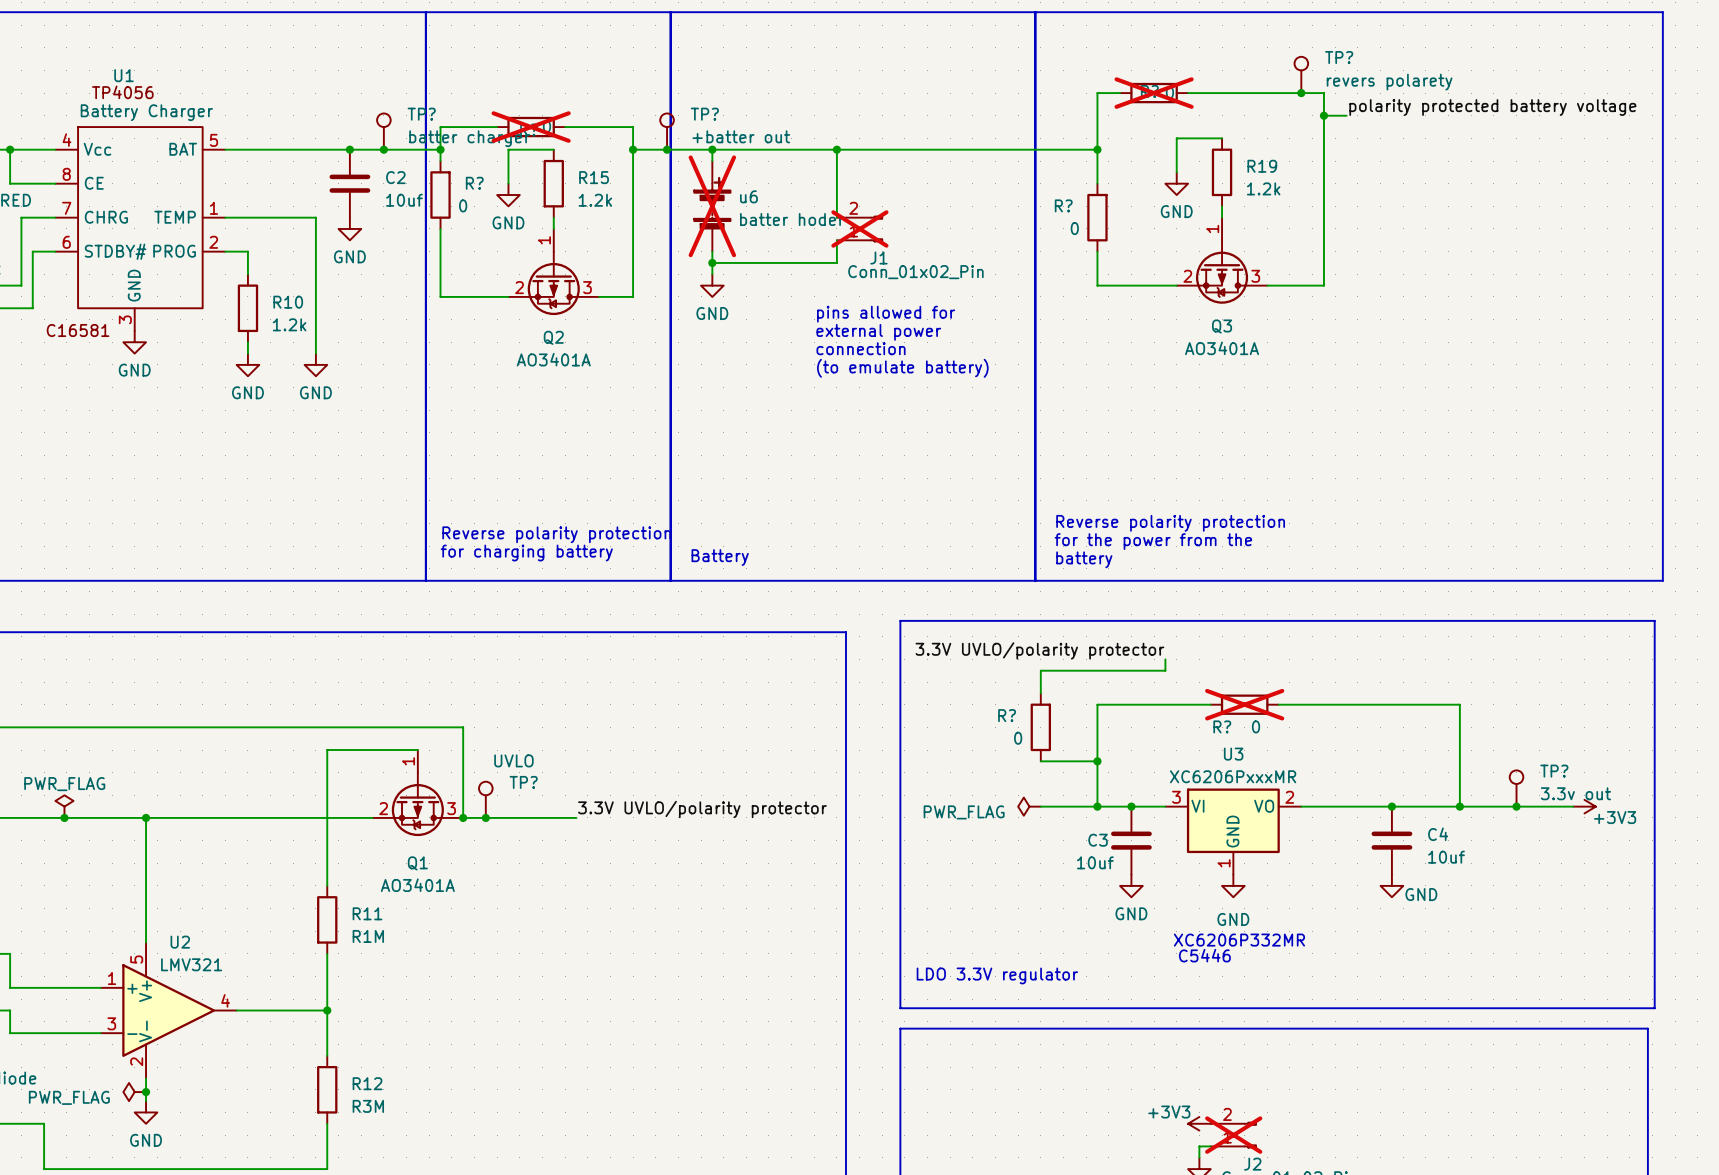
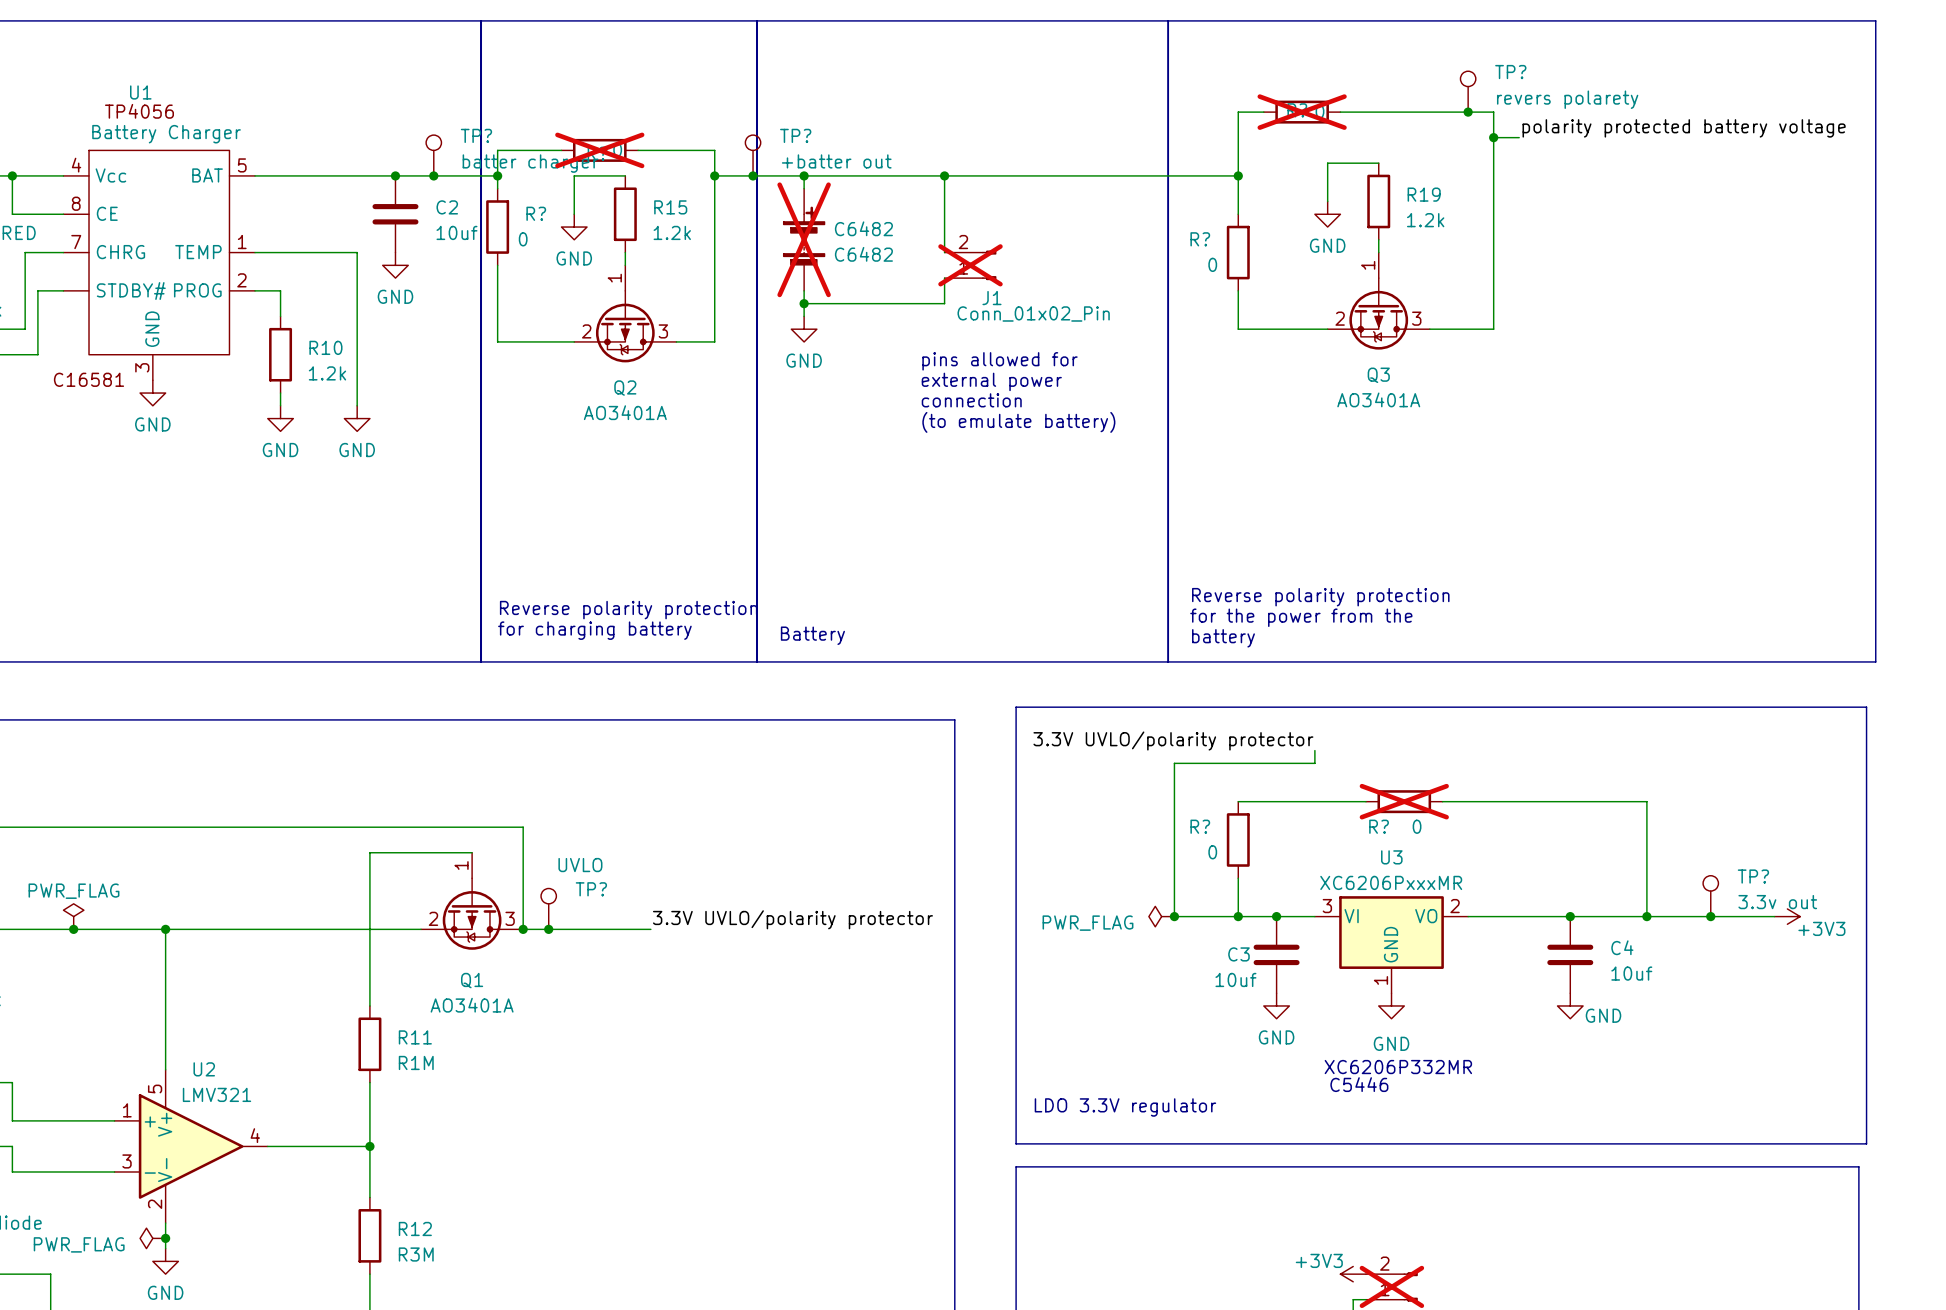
u6 name: u6 (748, 196) -> C6482 (863, 228)
u6 value: batter hoder (792, 219) -> C6482 (863, 254)
U1 pin number: 6 (66, 242) -> none
wire: none -> (1174, 788) (1174, 916)
wire: (1097, 704) (1097, 772) -> none
R? position: (1040, 727) -> (1238, 839)
wire: (1040, 761) (1097, 761) -> none
junction: (1097, 761) -> none
junction: none -> (1174, 916)

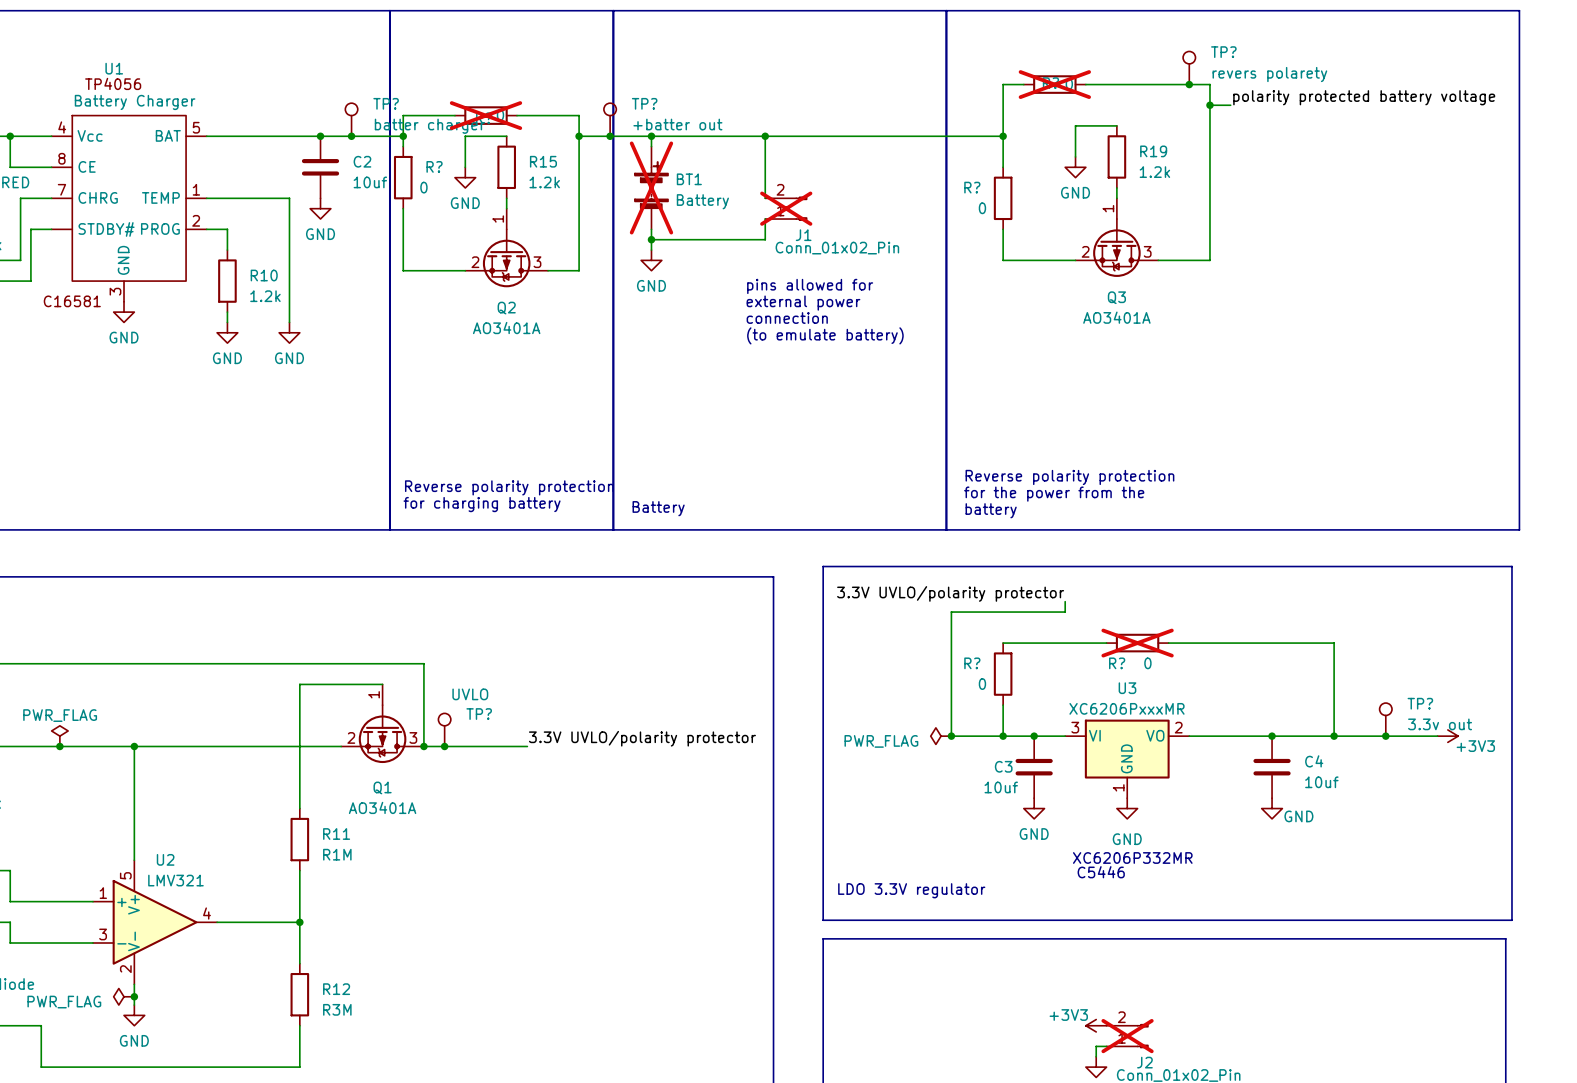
C6482 name: C6482 (863, 228) -> BT1 (689, 179)
C6482 value: C6482 (863, 254) -> Battery (702, 201)

